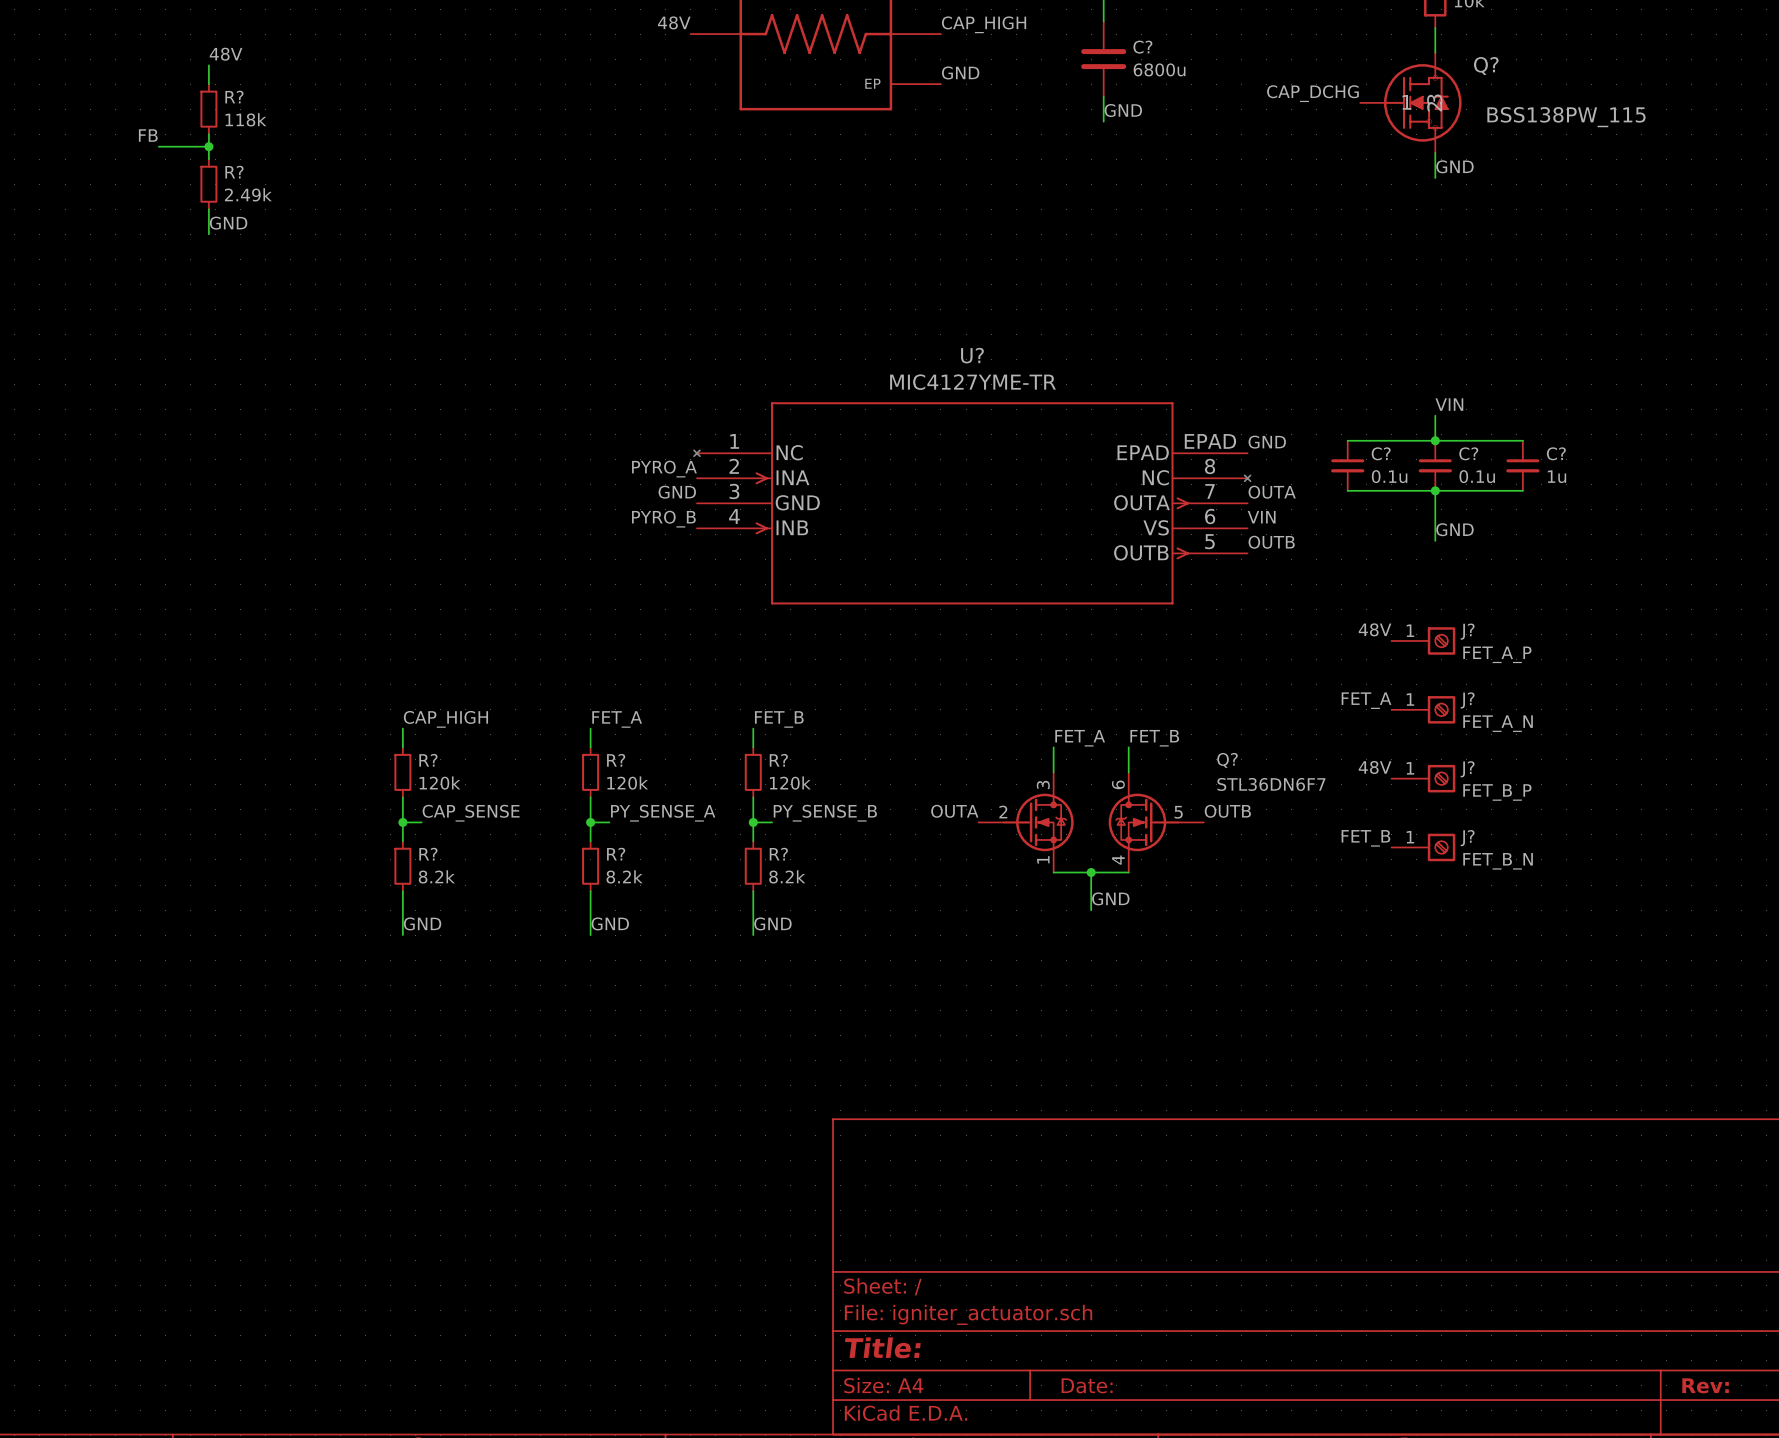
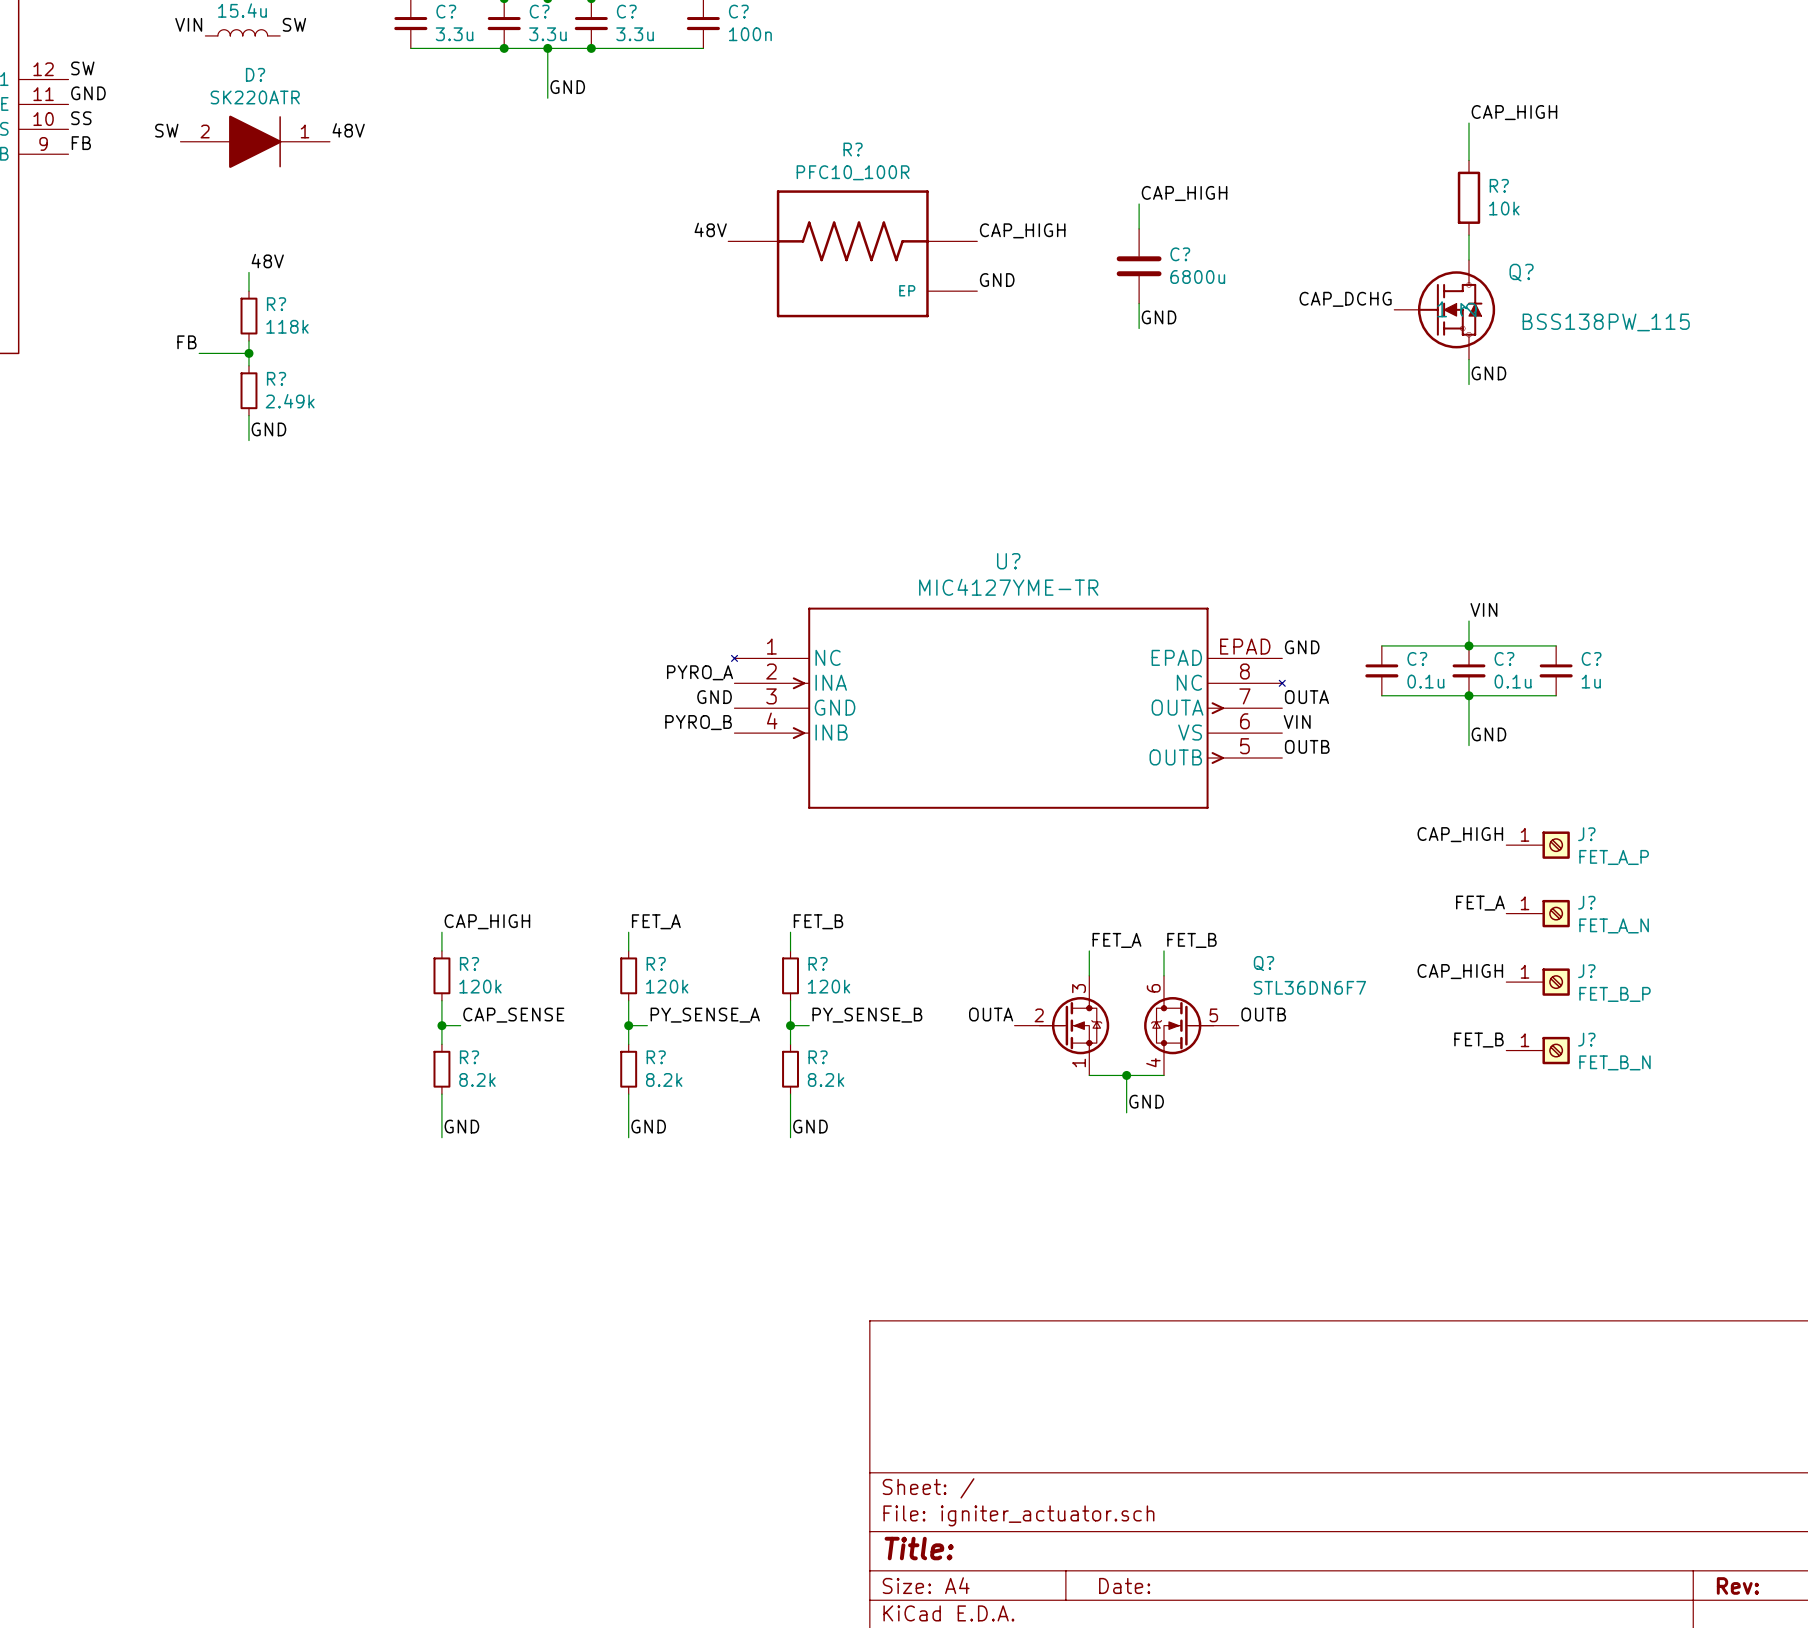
label: 48V (1375, 629) -> none
label: none -> CAP_HIGH (1460, 834)
J? position: (1423, 641) -> (1538, 845)
label position: FET_A (1366, 700) -> FET_A (1480, 903)
J? position: (1423, 709) -> (1538, 913)
label: 48V (1375, 767) -> none
label: none -> CAP_HIGH (1460, 971)
J? position: (1423, 778) -> (1538, 982)
label position: FET_B (1365, 838) -> FET_B (1478, 1040)
J? position: (1423, 847) -> (1538, 1050)

